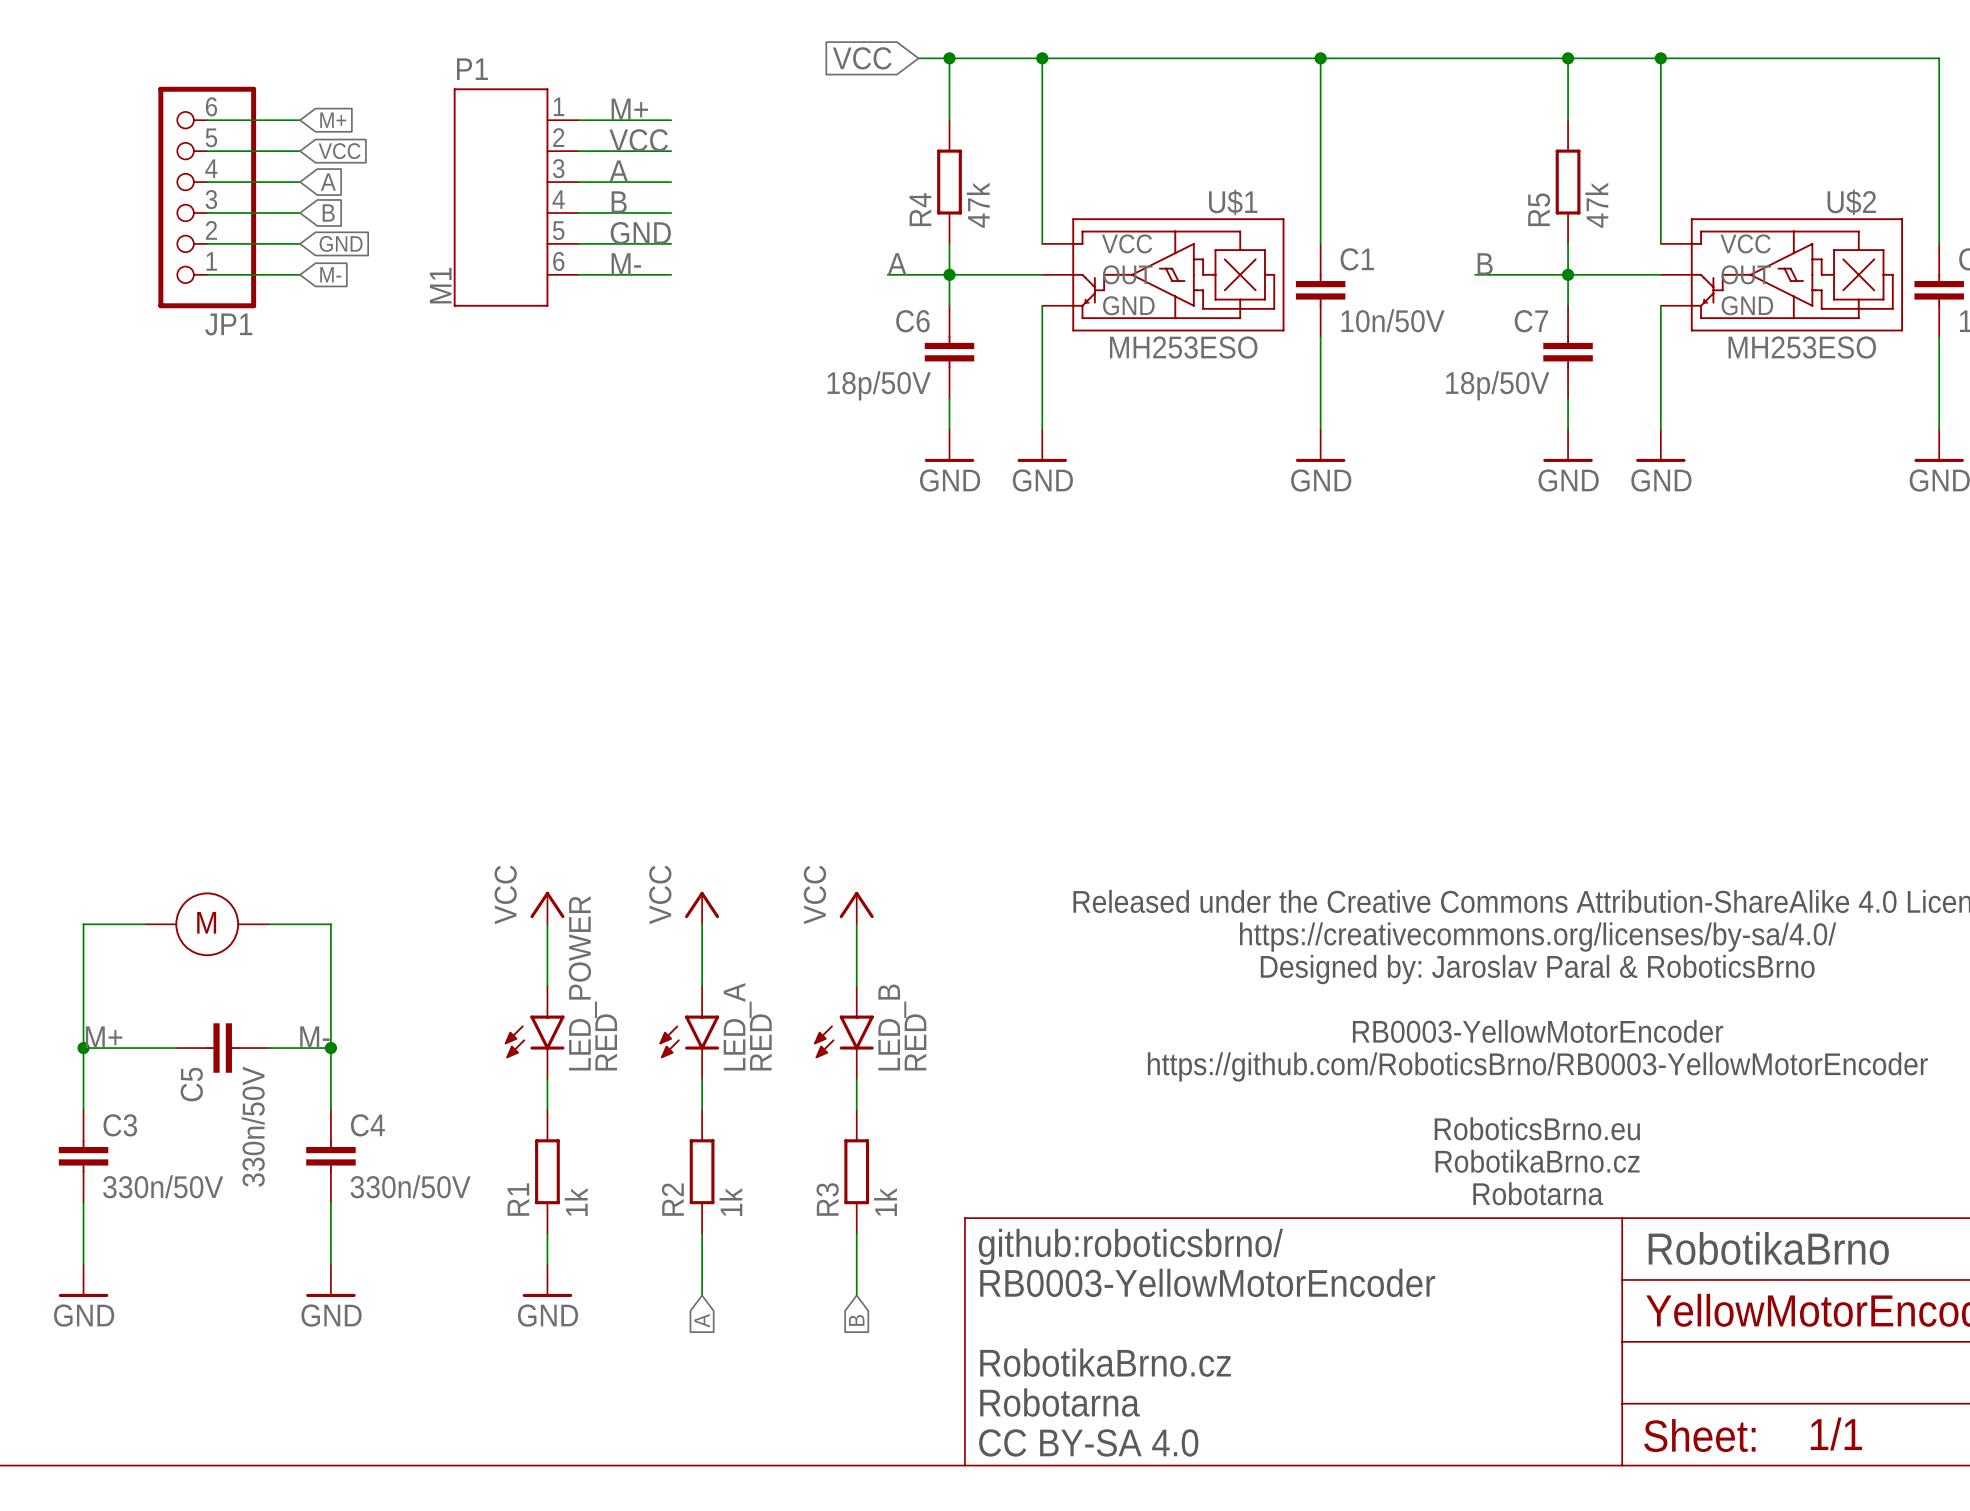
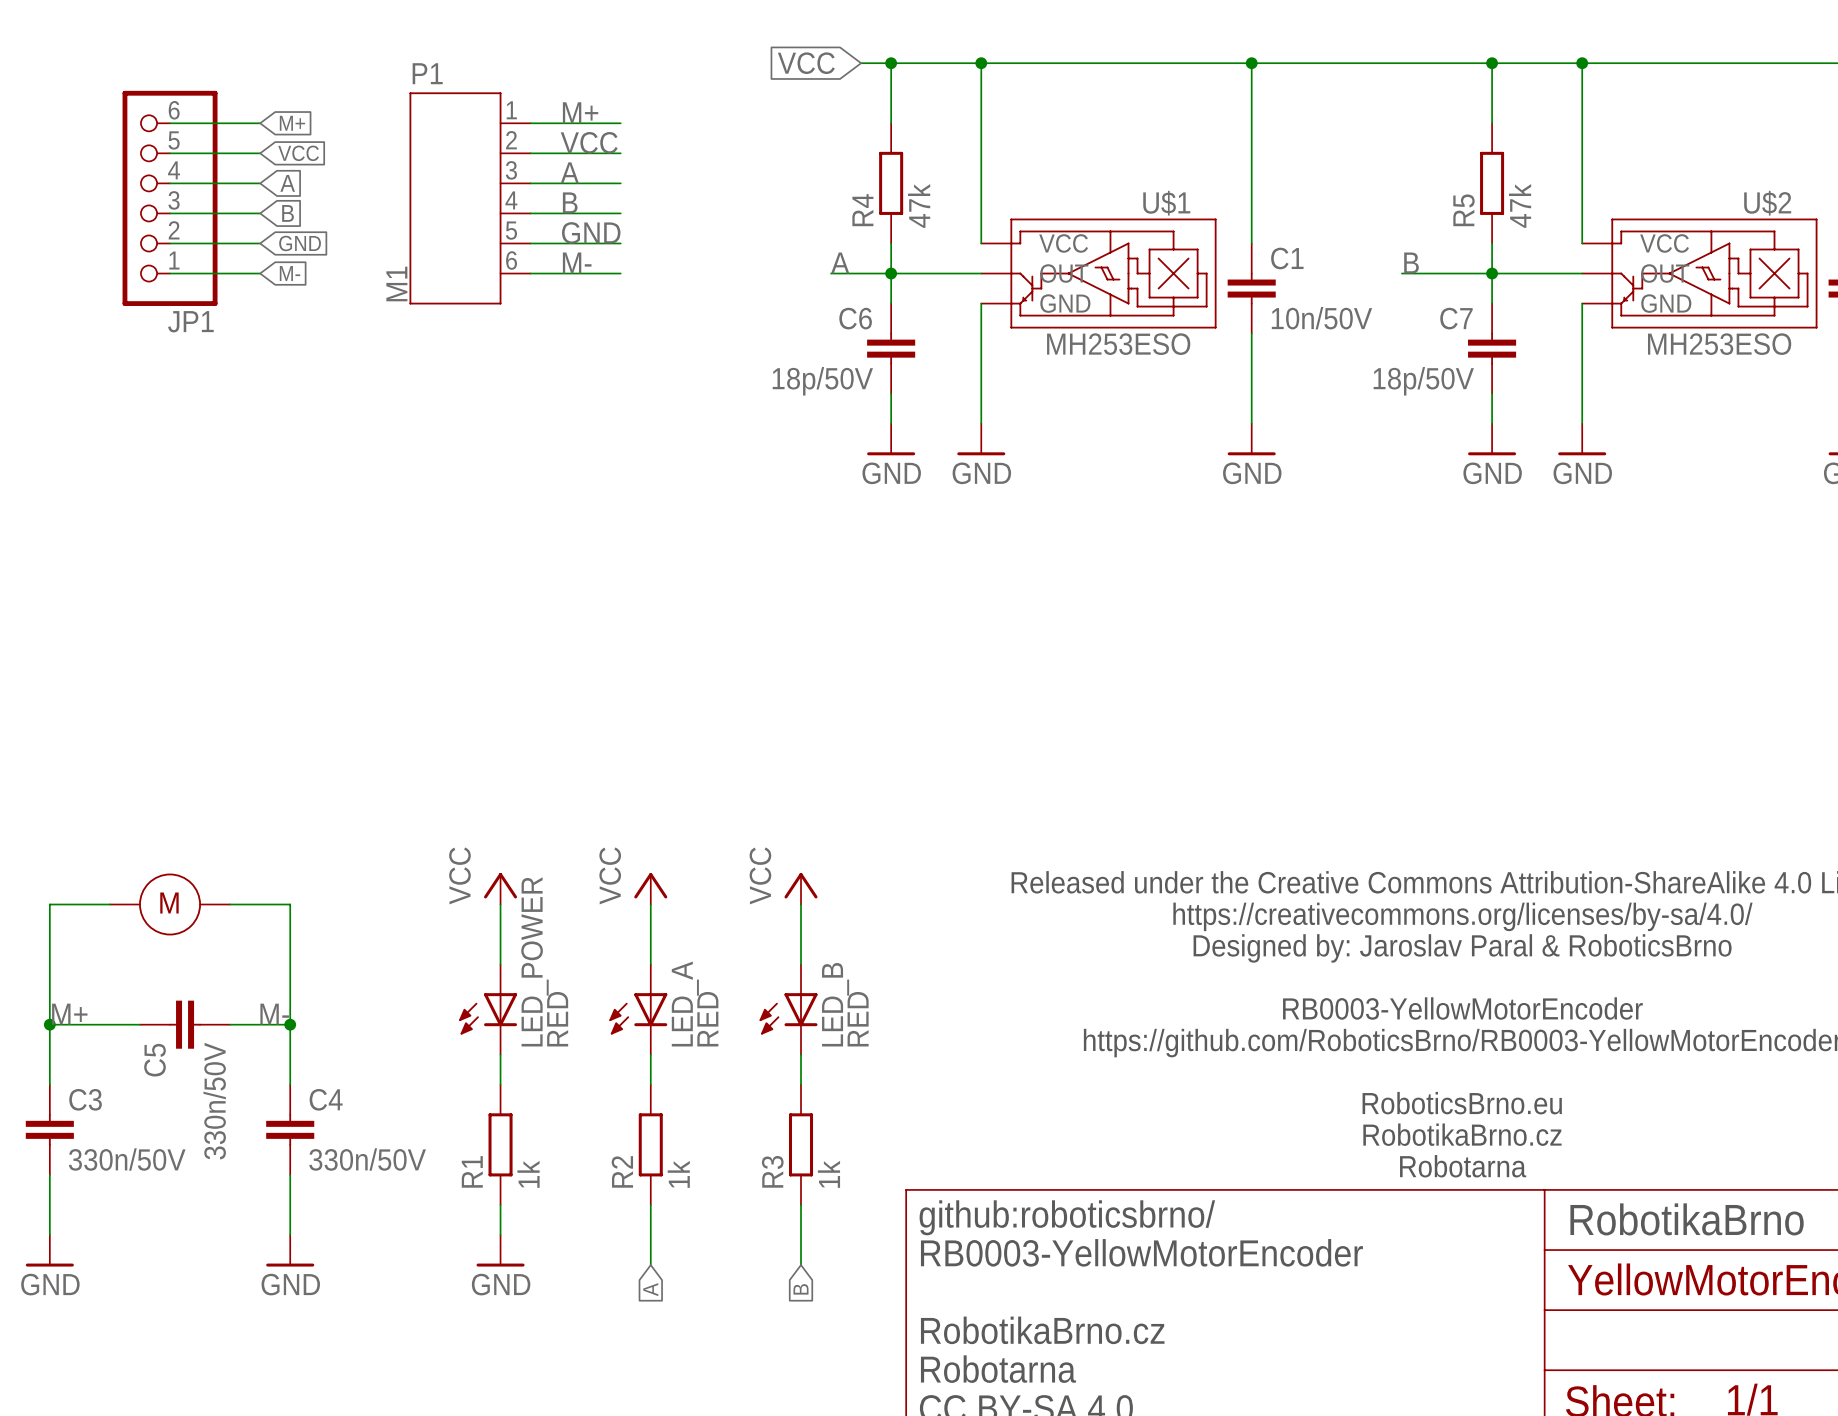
LED_POWER symbol: [504, 986, 565, 1079] -> [459, 964, 518, 1055]
LED_A symbol: [659, 986, 720, 1079] -> [609, 964, 668, 1055]
LED_B symbol: [814, 986, 874, 1079] -> [759, 964, 818, 1055]

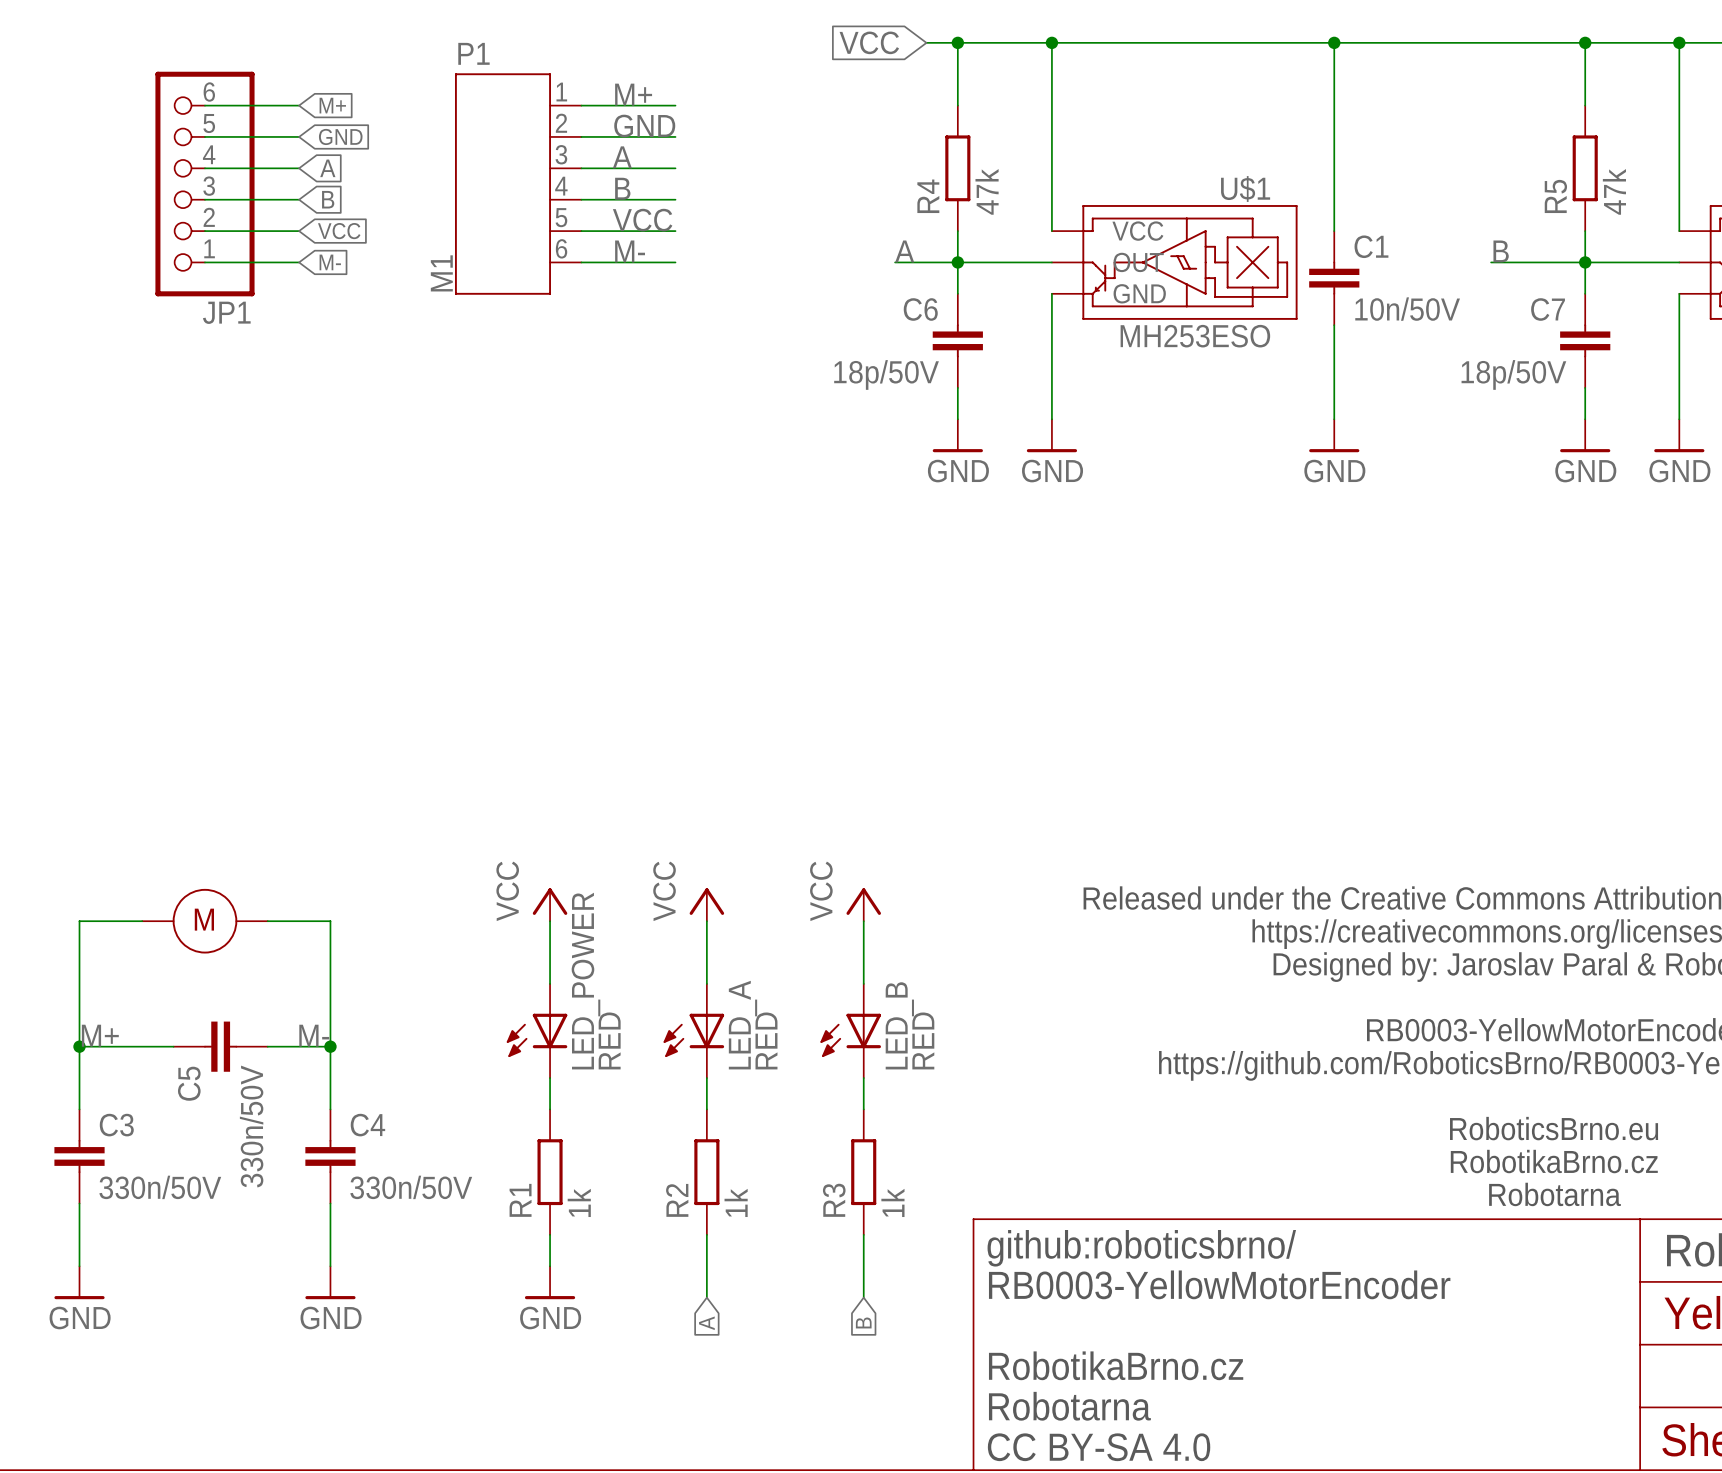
label: VCC (589, 142) -> GND (644, 125)
global label: VCC (298, 153) -> GND (340, 136)
label: GND (591, 232) -> VCC (642, 220)
global label: GND (300, 243) -> VCC (339, 231)

